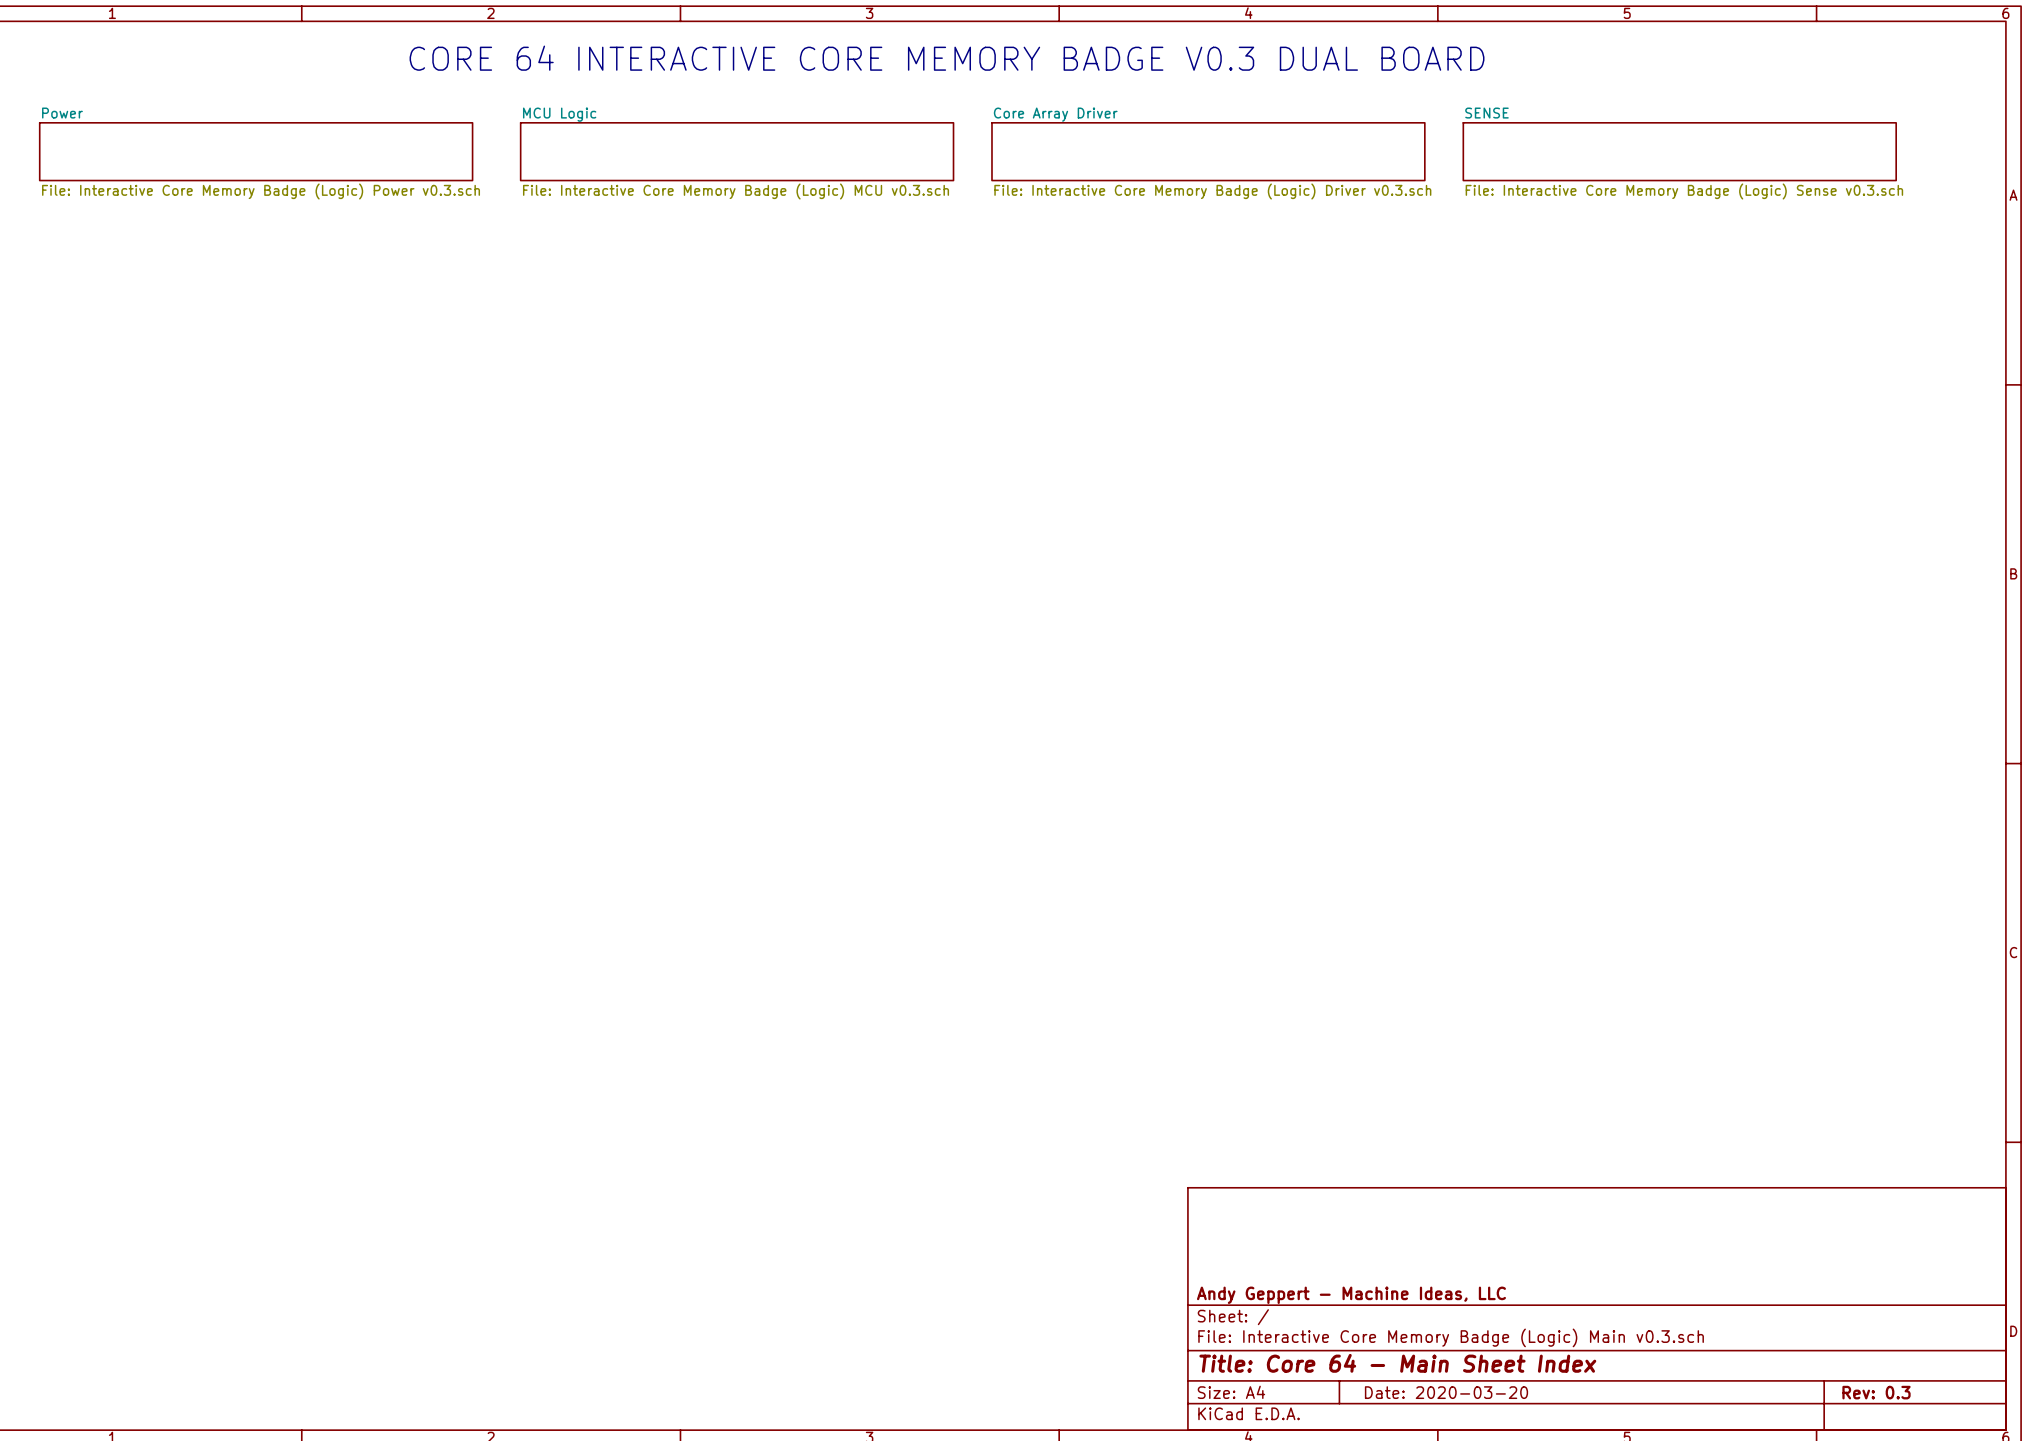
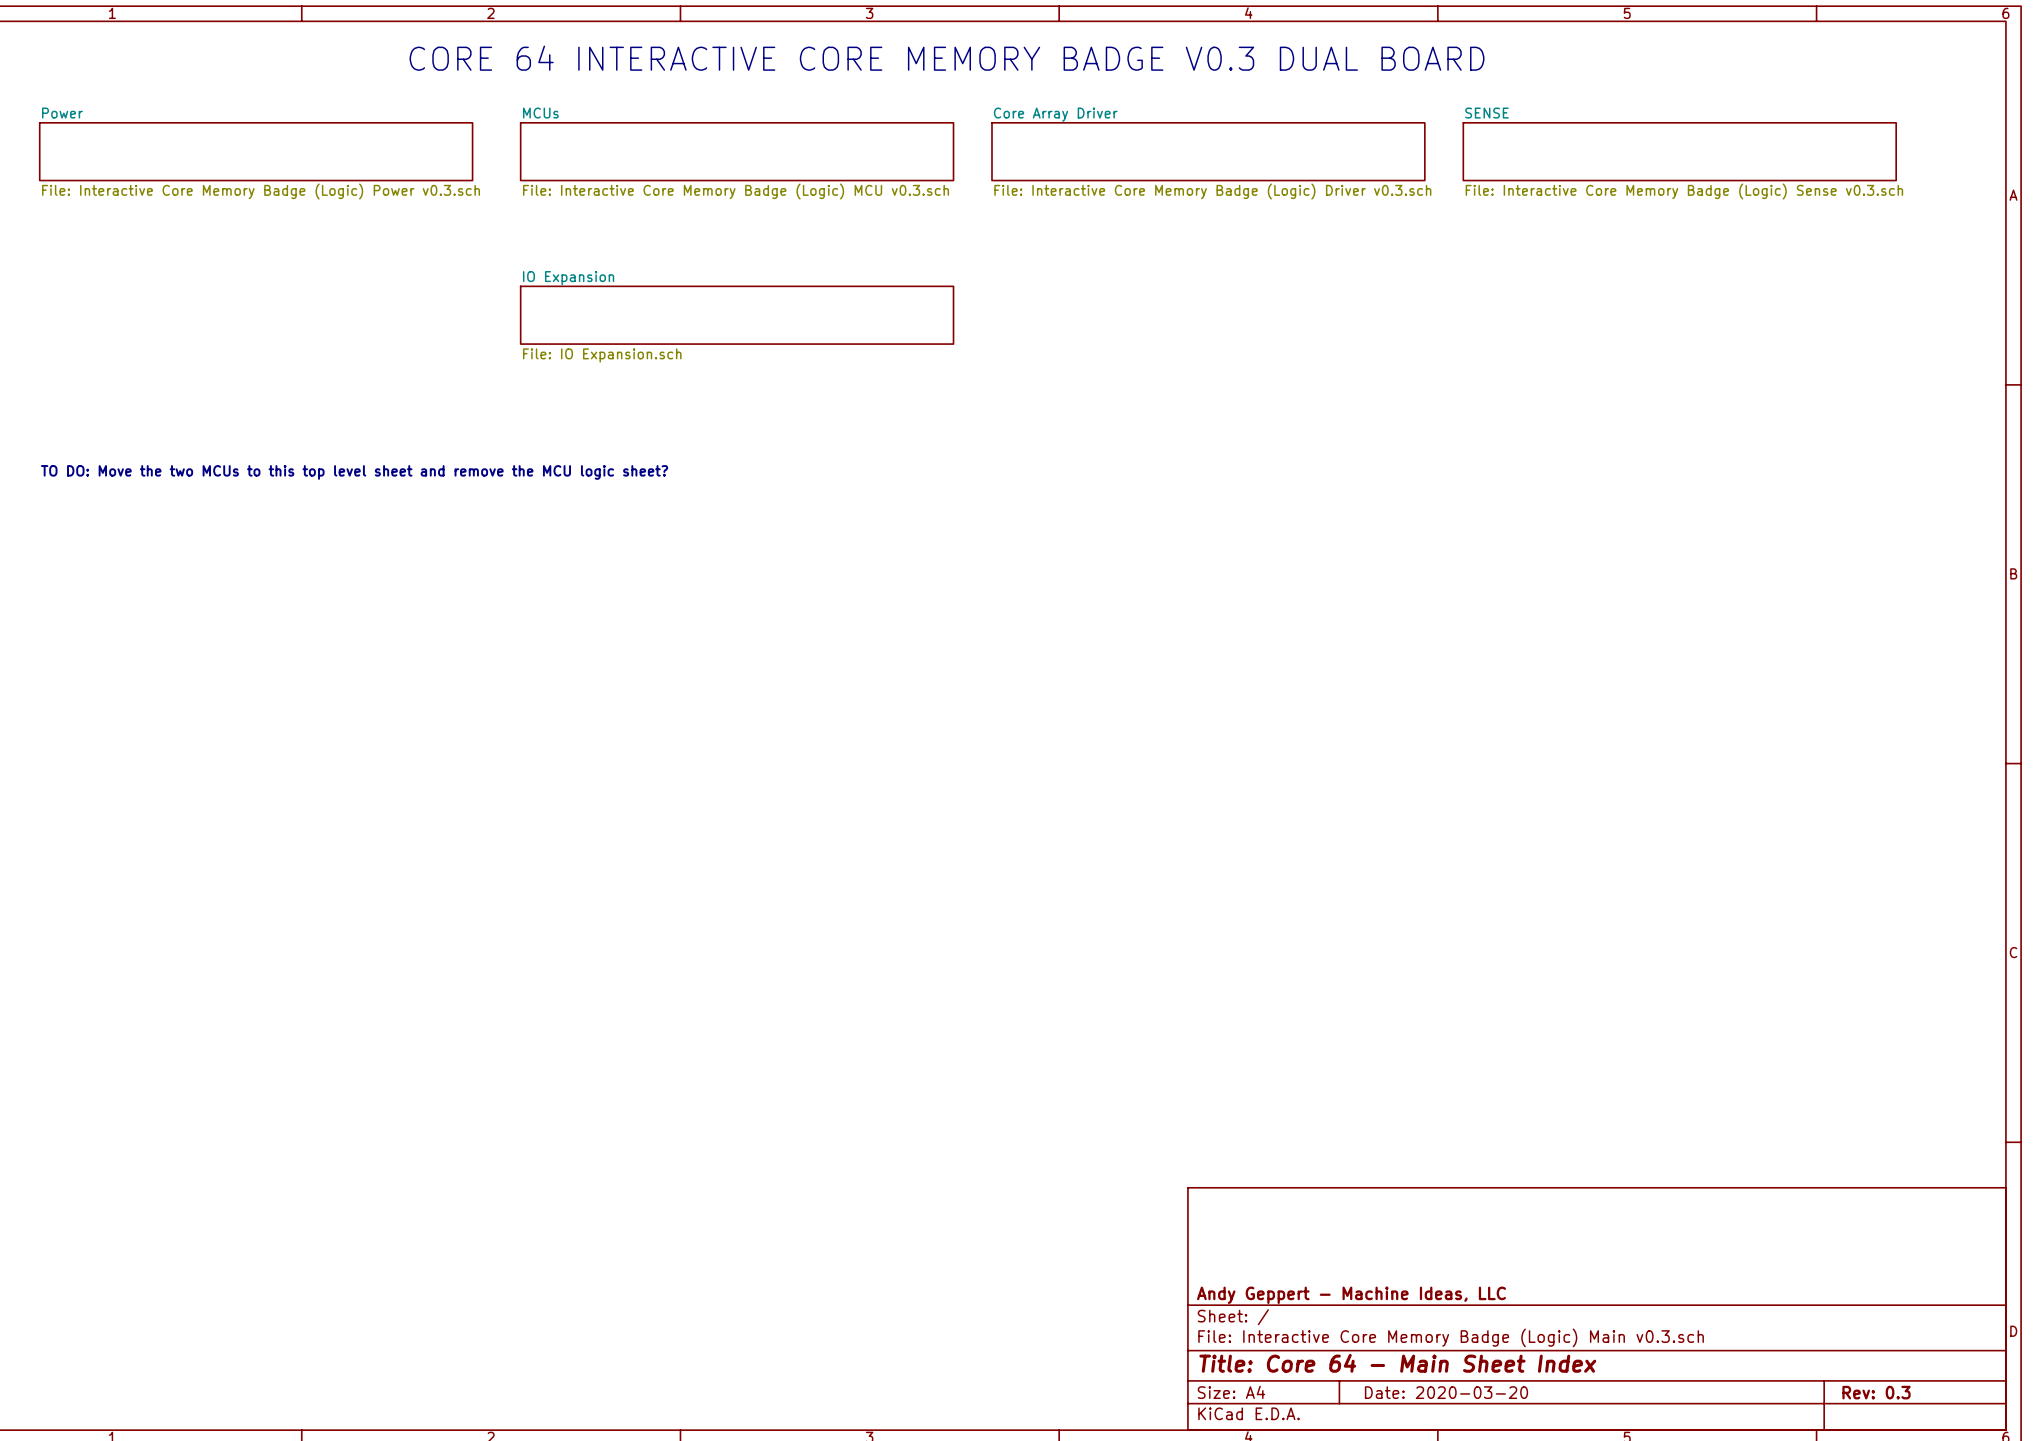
sheet MCU Logic name: MCU Logic (559, 114) -> MCUs (540, 113)
sheet IO Expansion: none -> File: IO Expansion.sch (737, 315)
text: none -> TO DO: Move the two MCUs to this top level sheet and remove the MCU logic sheet? (354, 472)

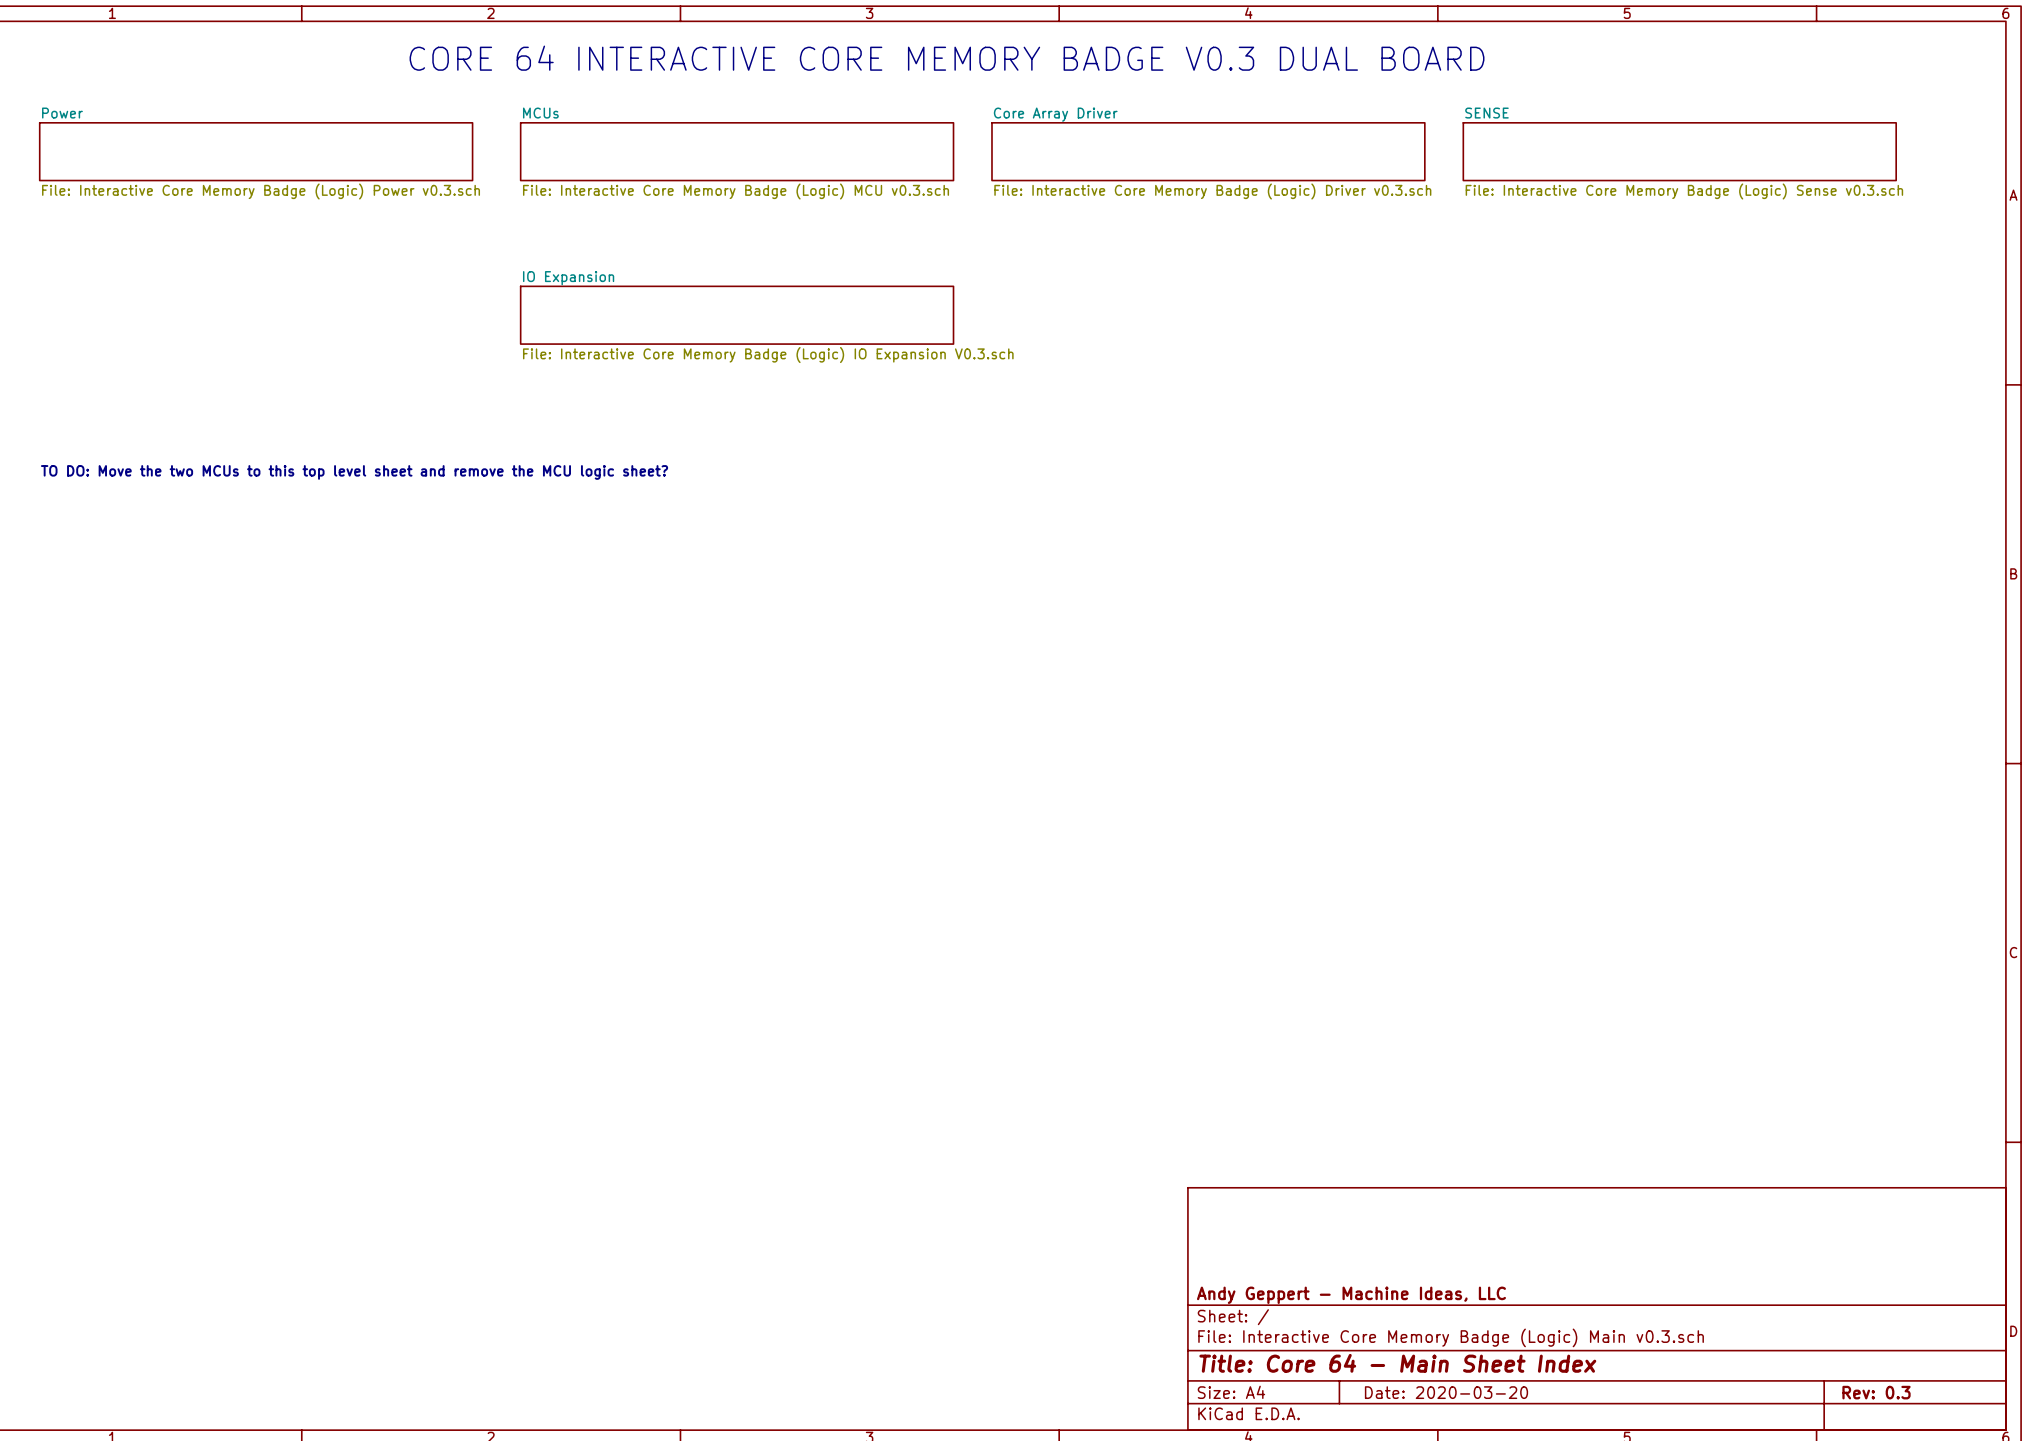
sheet IO Expansion value: File: IO Expansion.sch (602, 355) -> File: Interactive Core Memory Badge (Logic) IO Expansion V0.3.sch (768, 355)

